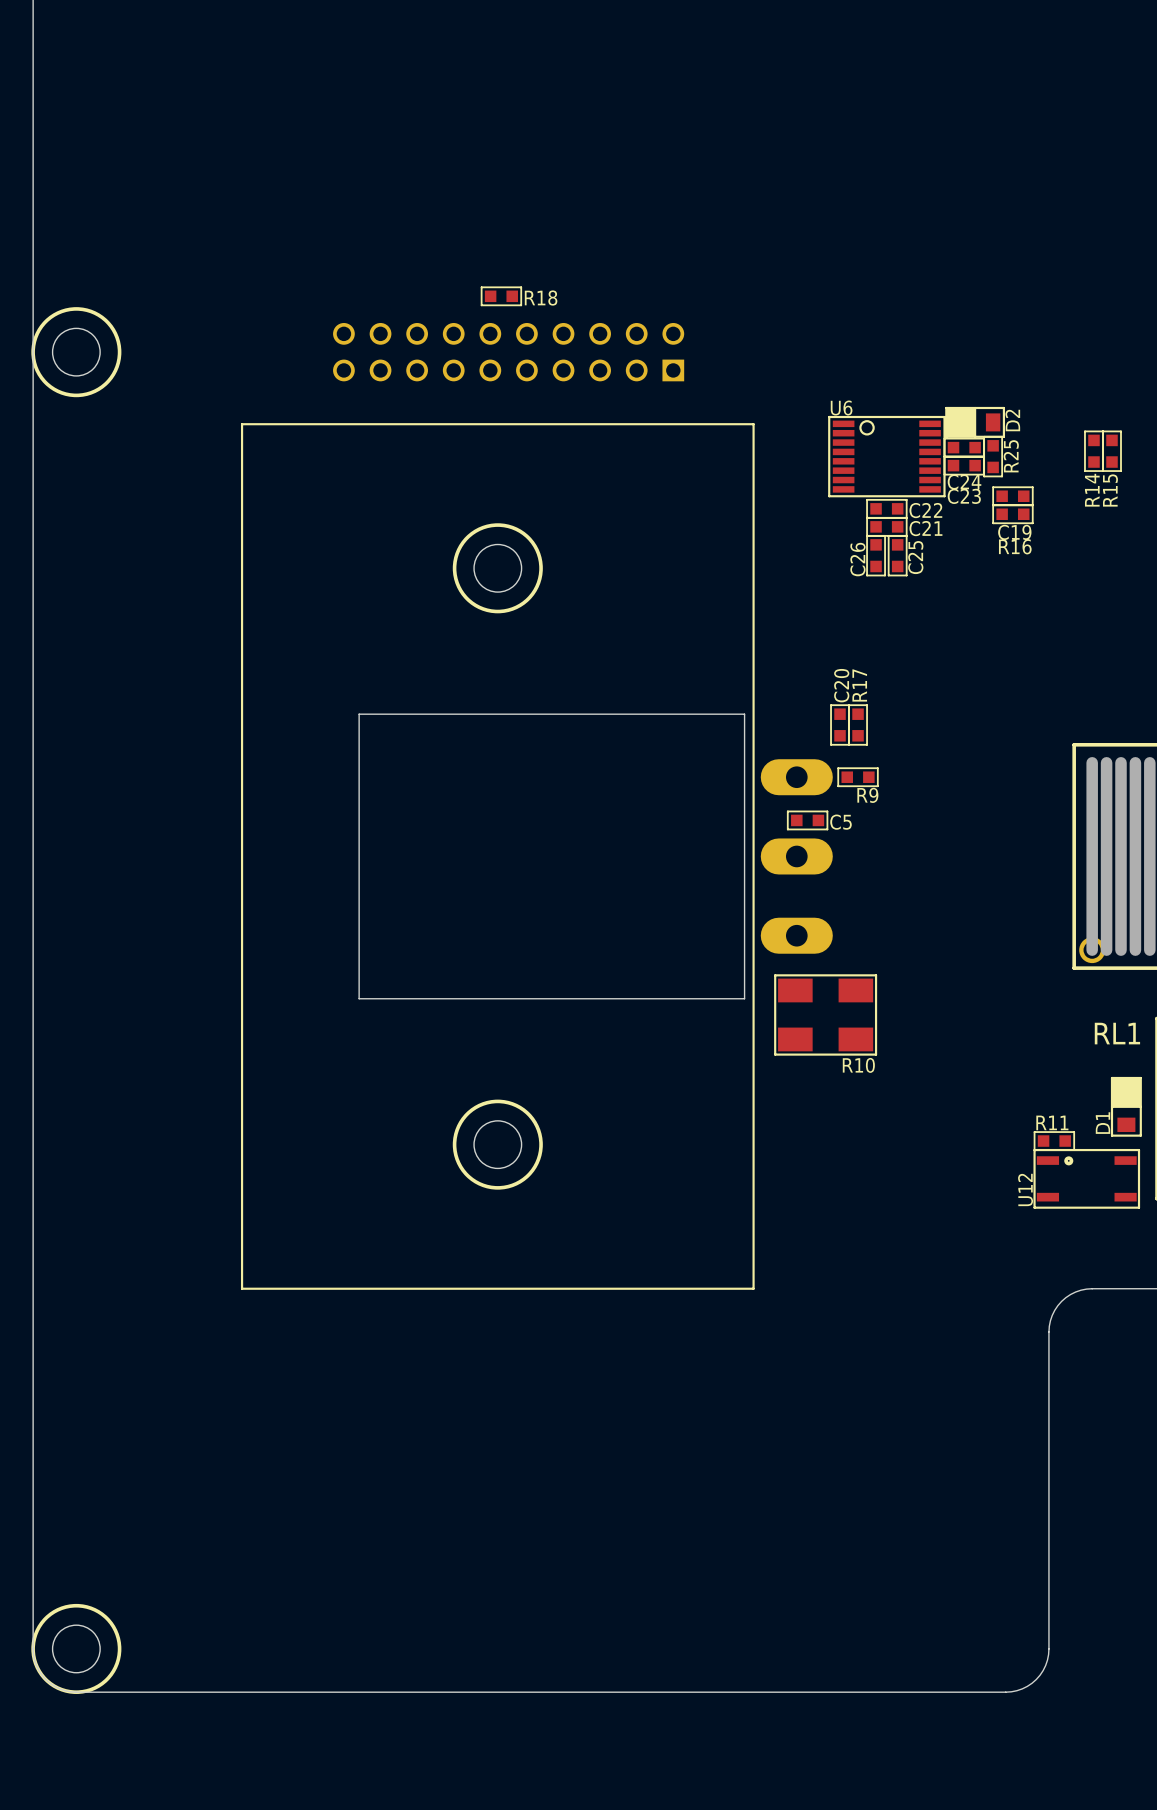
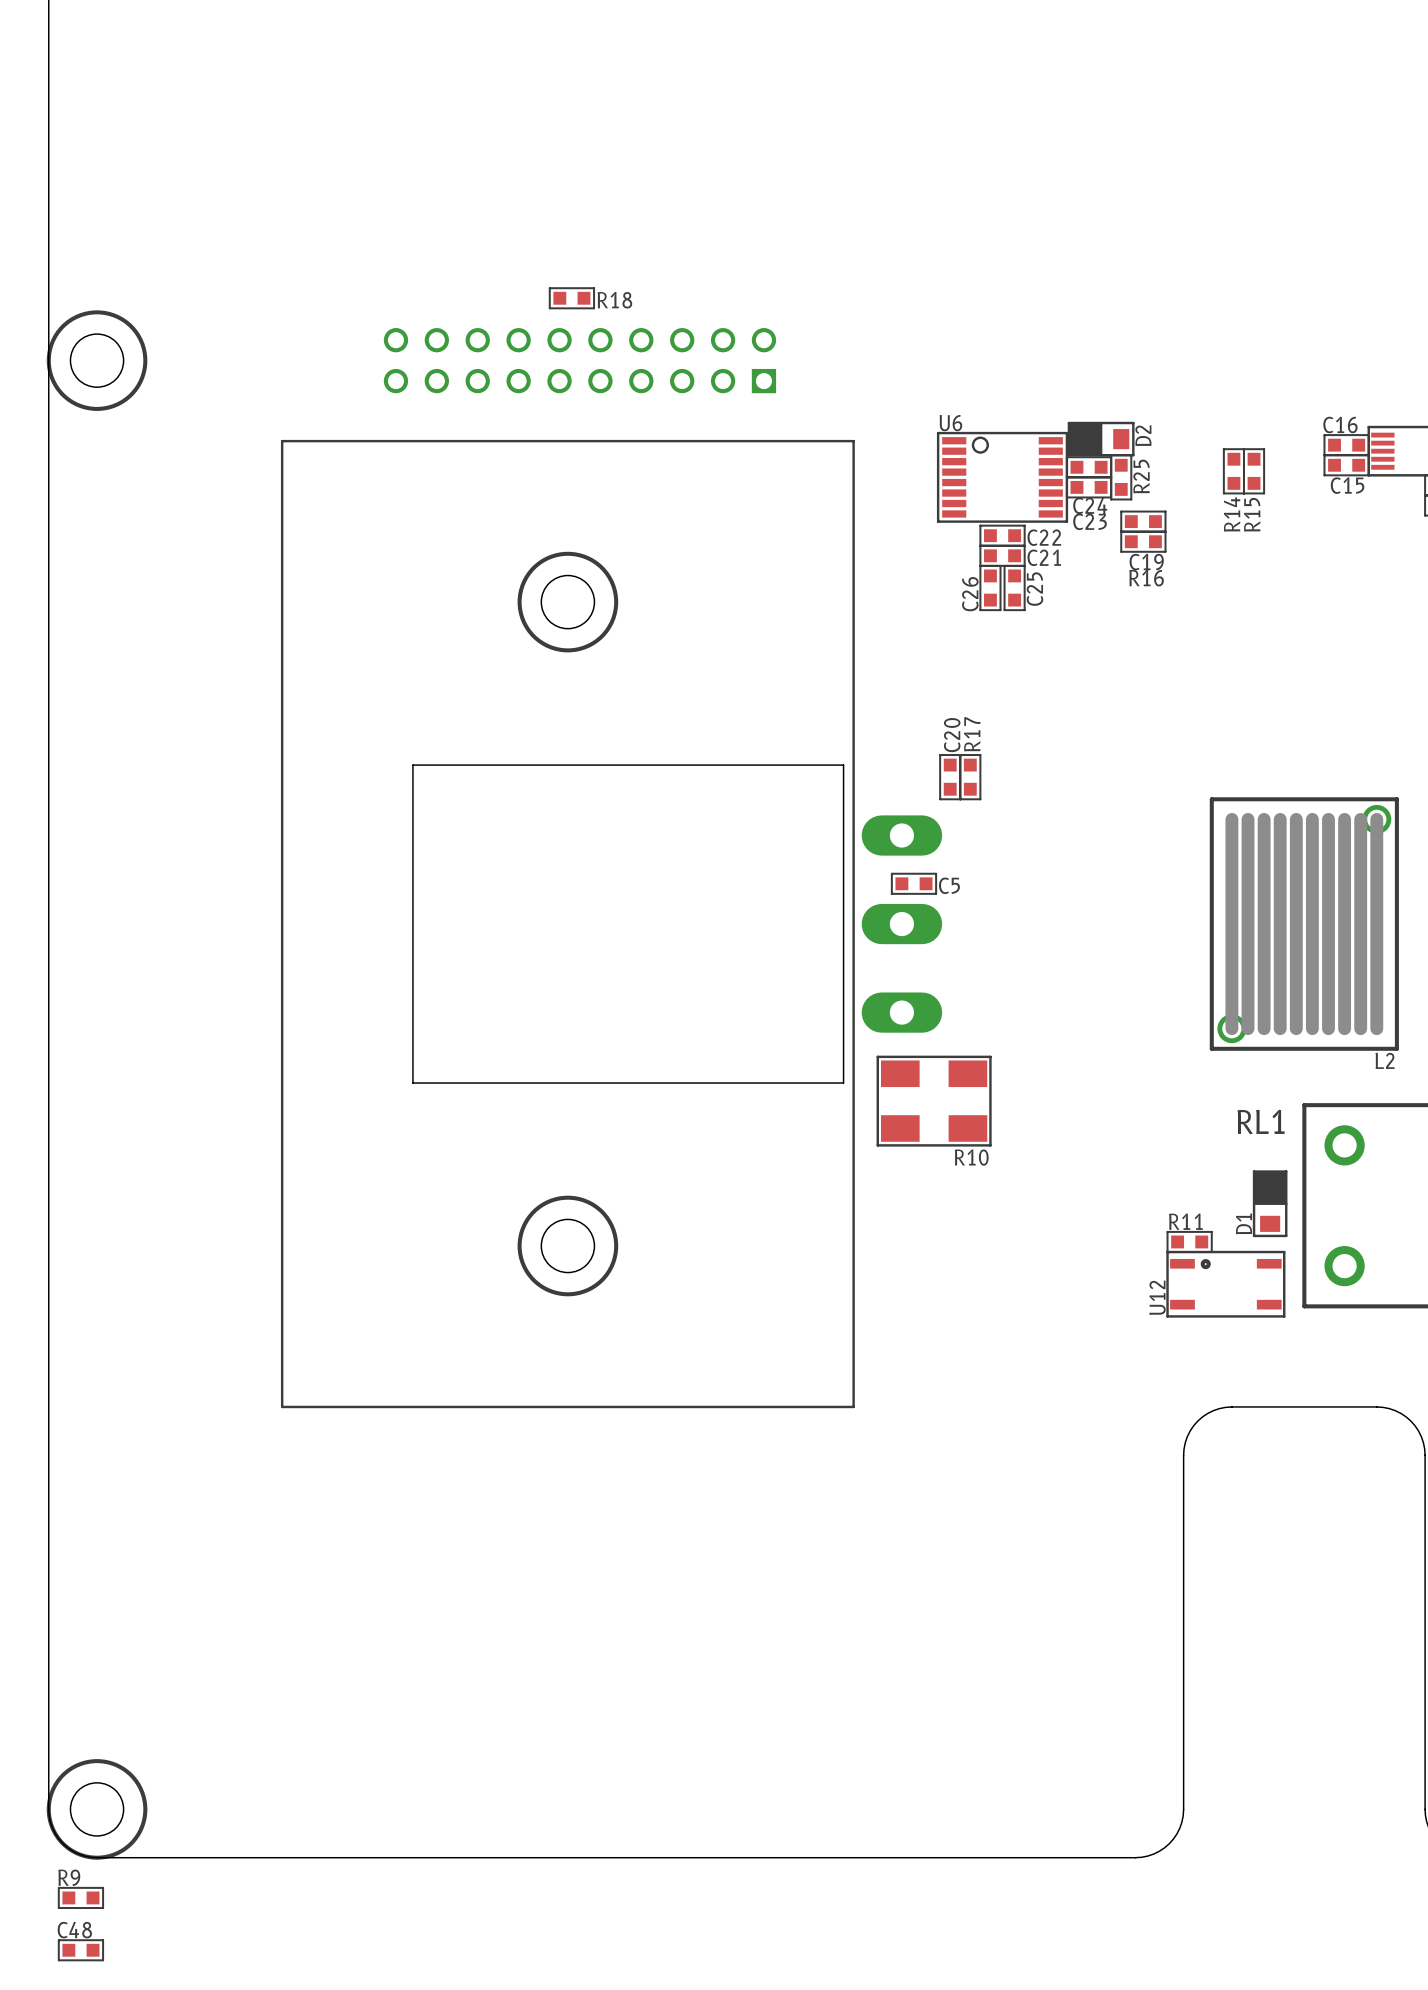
R9 position: (858, 777) -> (80, 1897)
R9 name position: R9 (867, 795) -> R9 (69, 1877)
C48: none -> (80, 1950)

